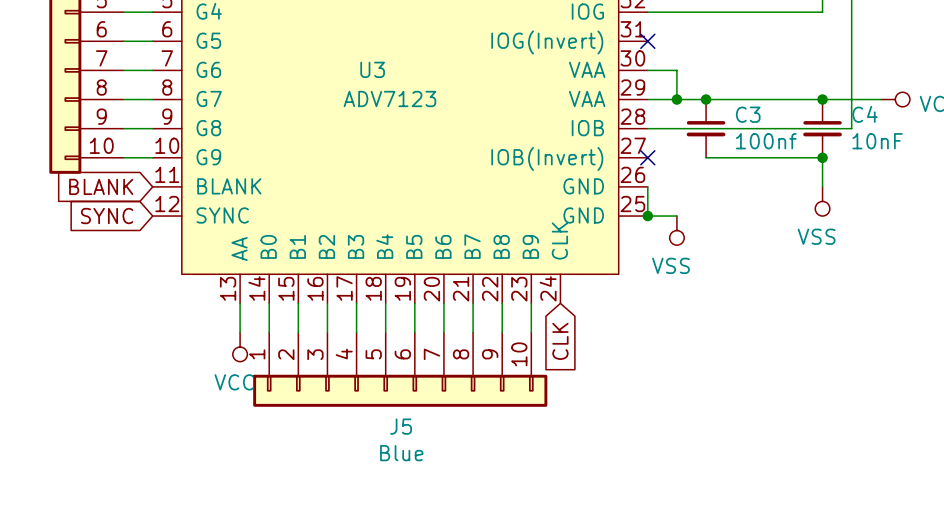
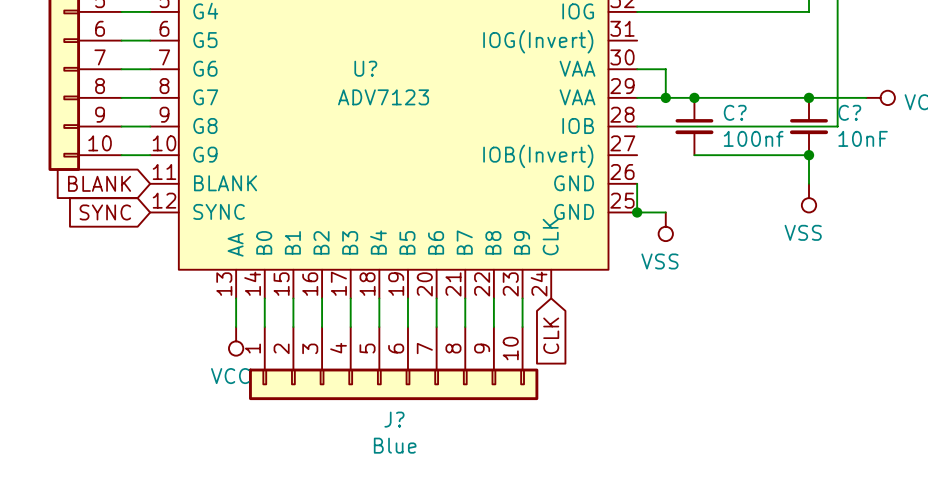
no-connect mark: (647, 41) -> none
U3 name: U3 (372, 69) -> U? (365, 68)
C3 name: C3 (748, 114) -> C? (735, 112)
C4 name: C4 (865, 114) -> C? (849, 112)
no-connect mark: (647, 157) -> none
J5 name: J5 (401, 426) -> J? (394, 419)

